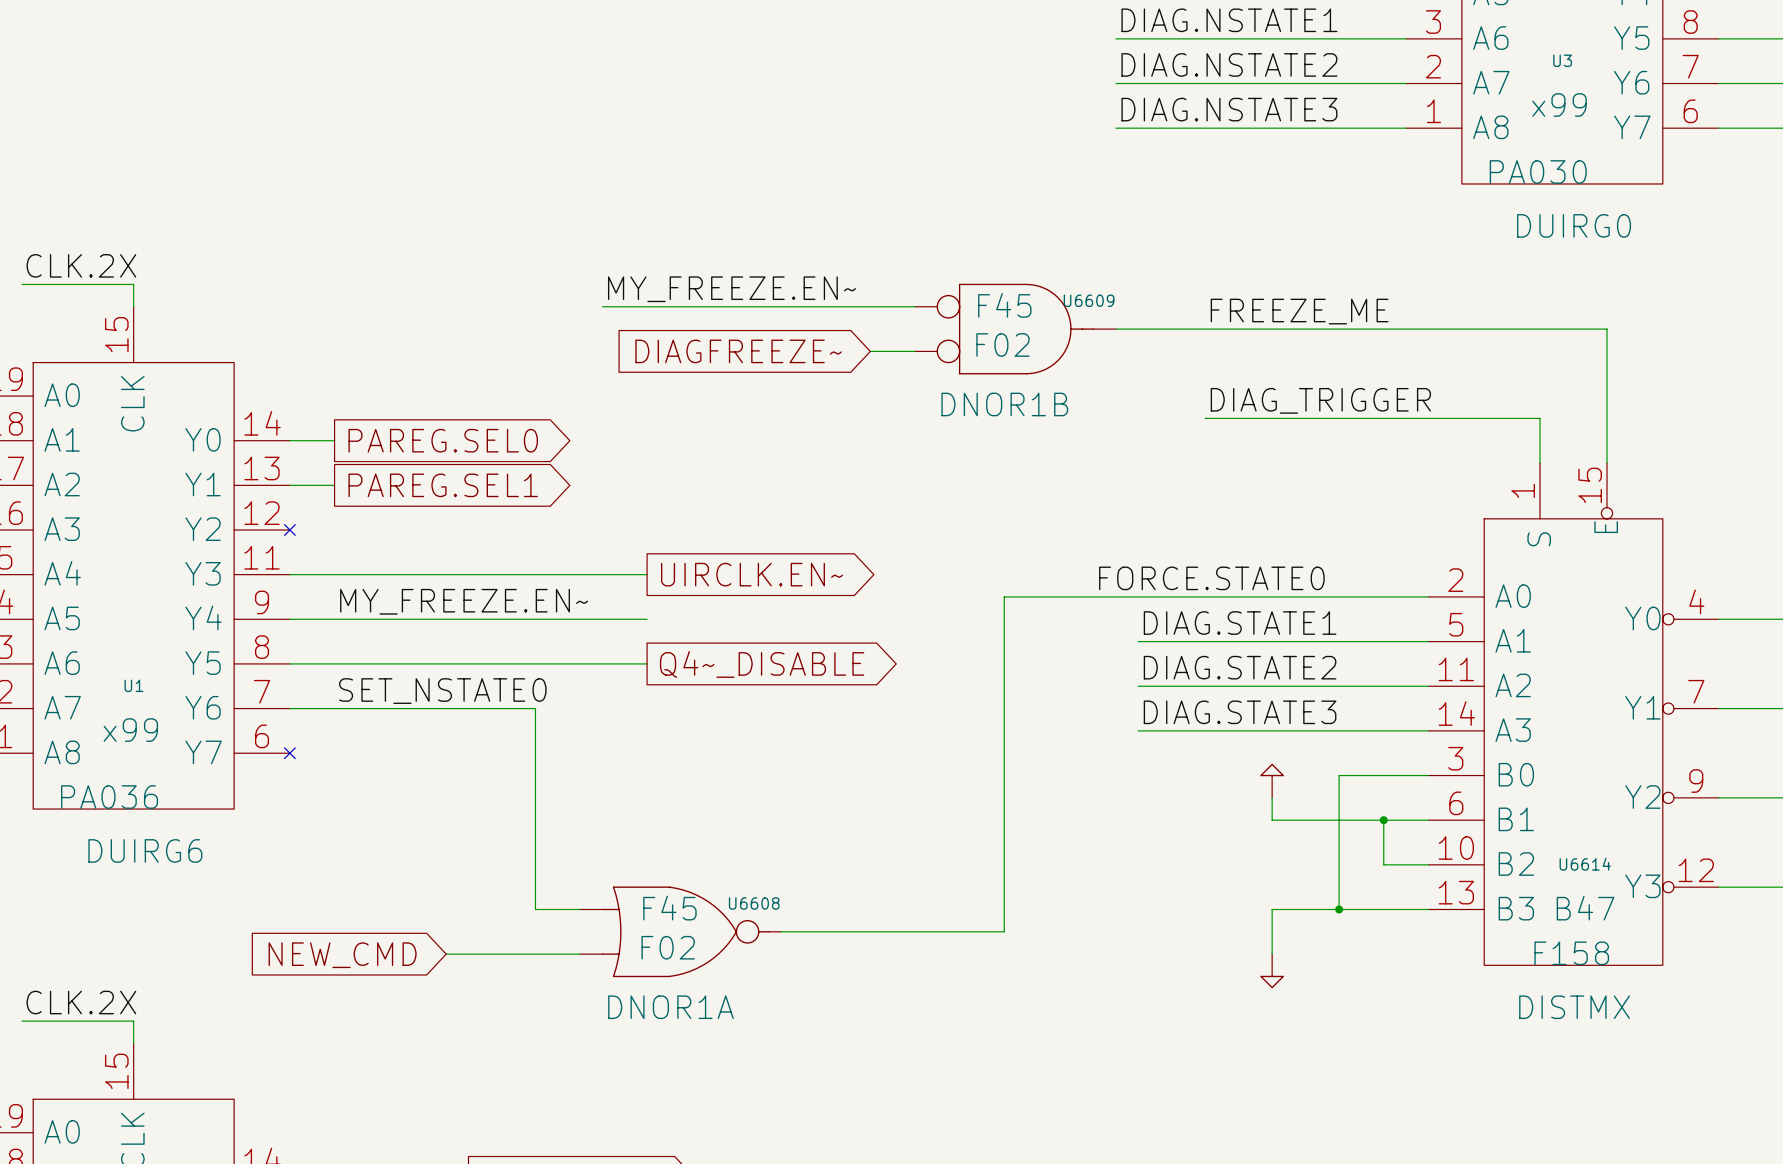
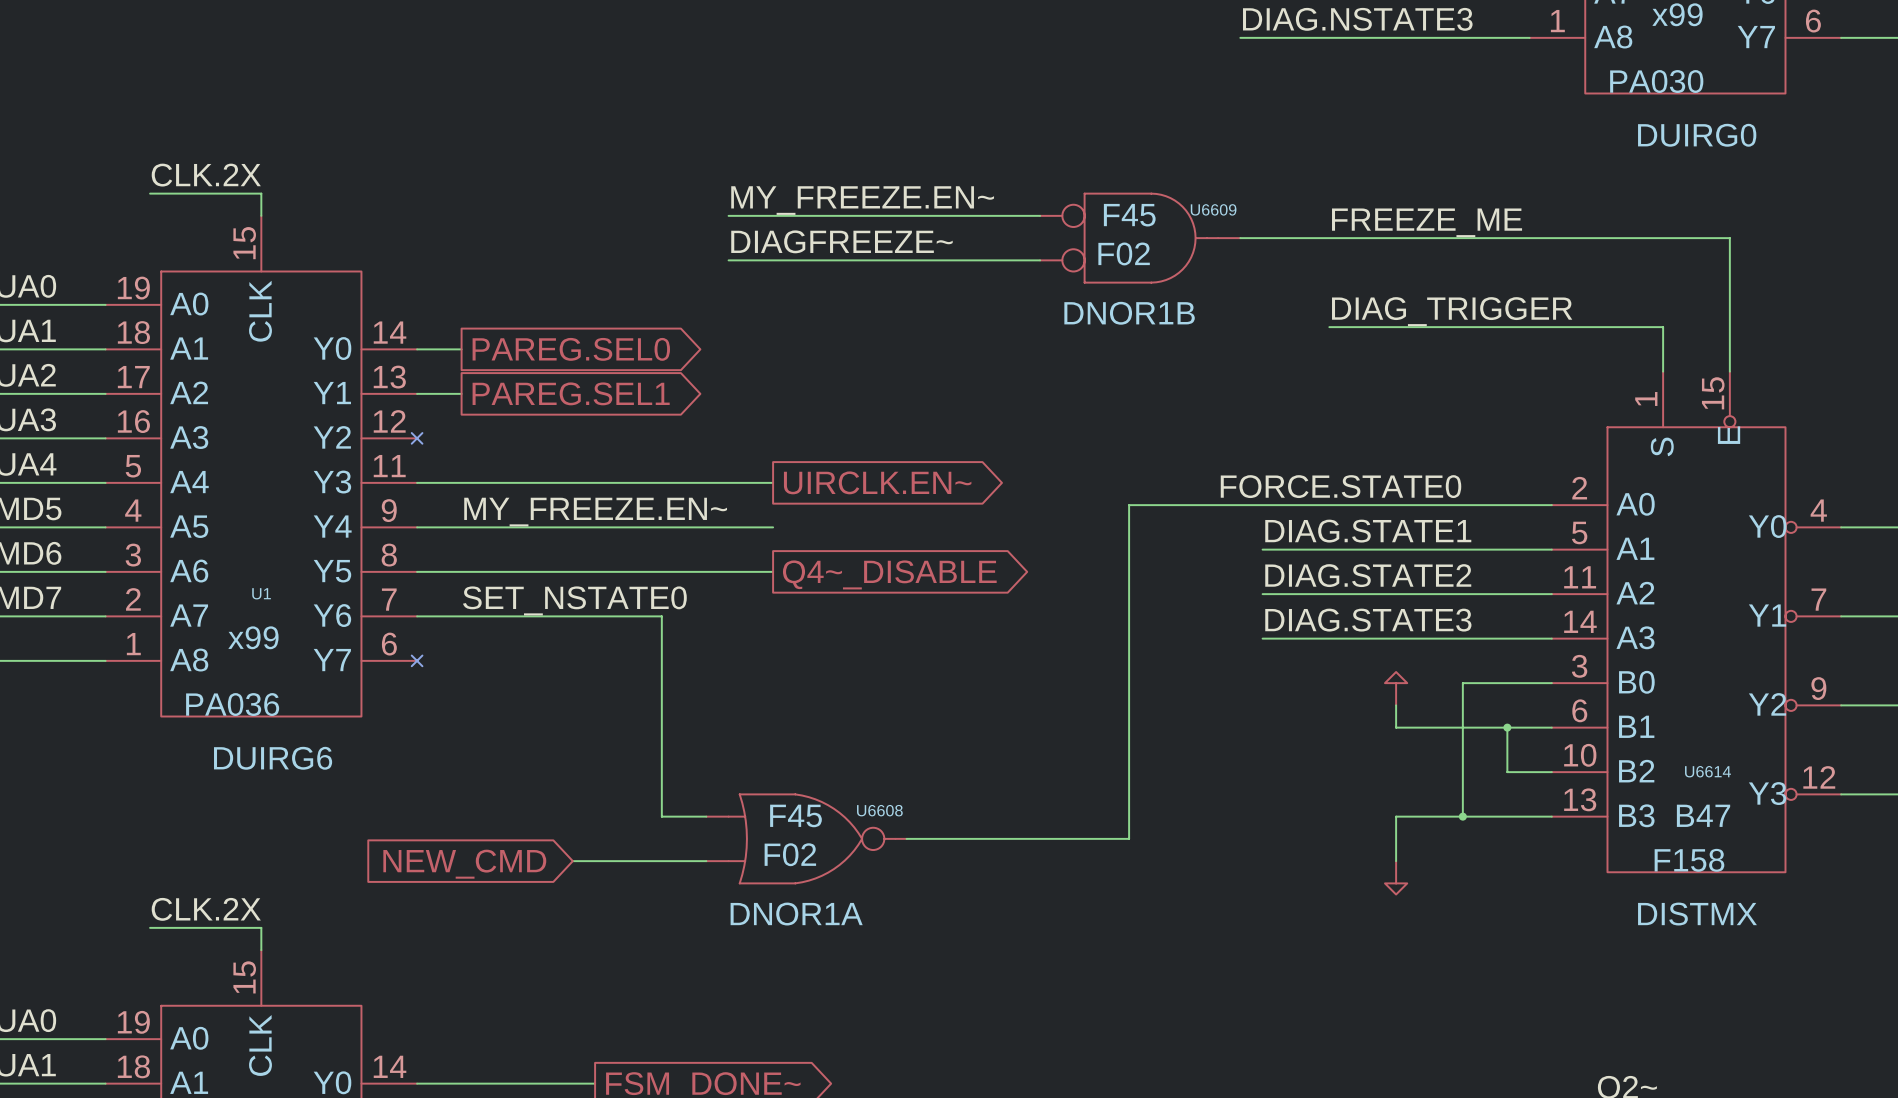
label: none -> DIAGFREEZE~ (841, 241)
wire: none -> (728, 260) (995, 260)
global label: DIAGFREEZE~ (738, 351) -> none

